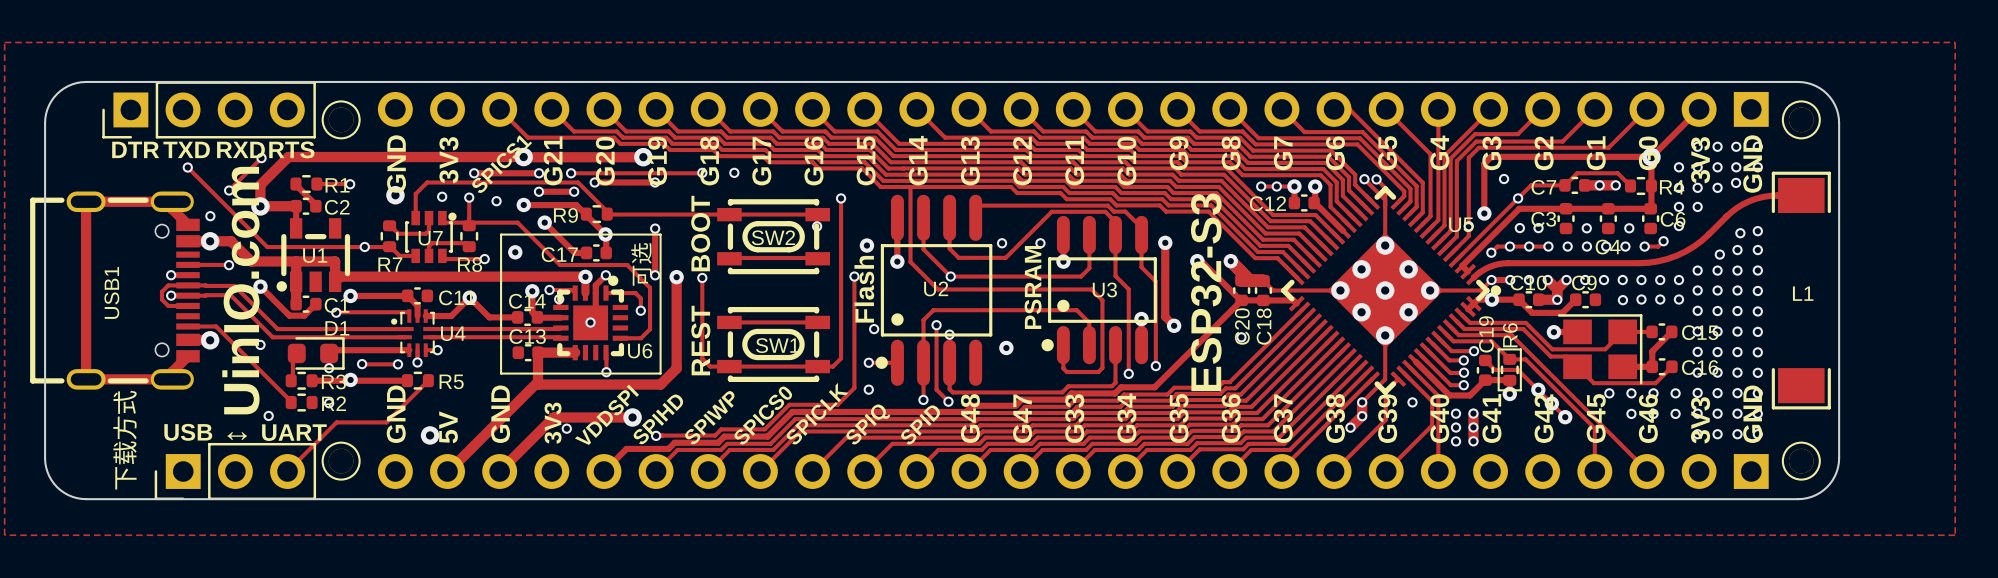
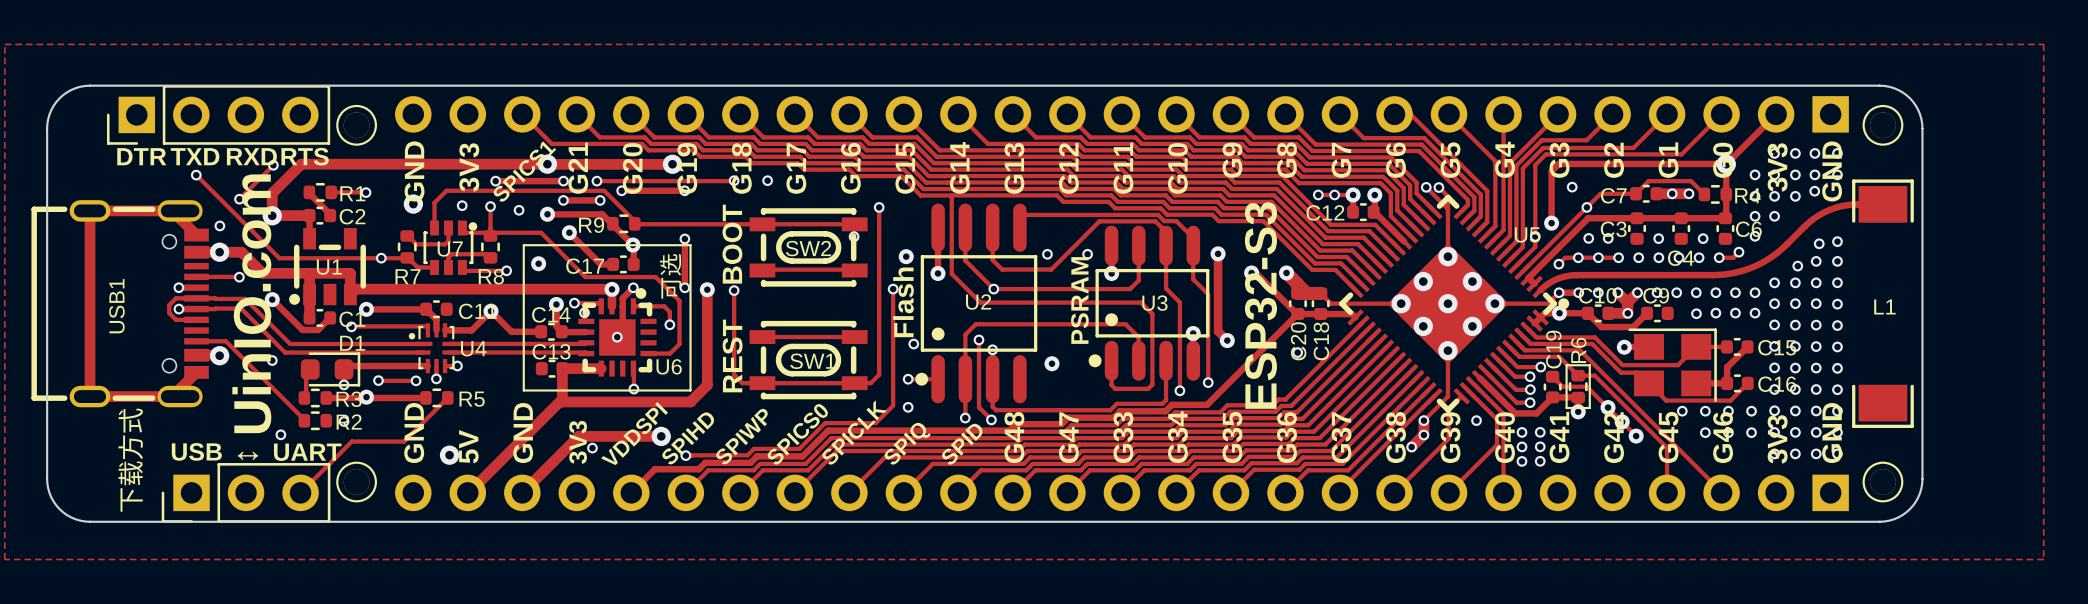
track: (1473, 413) (1473, 441) -> none

